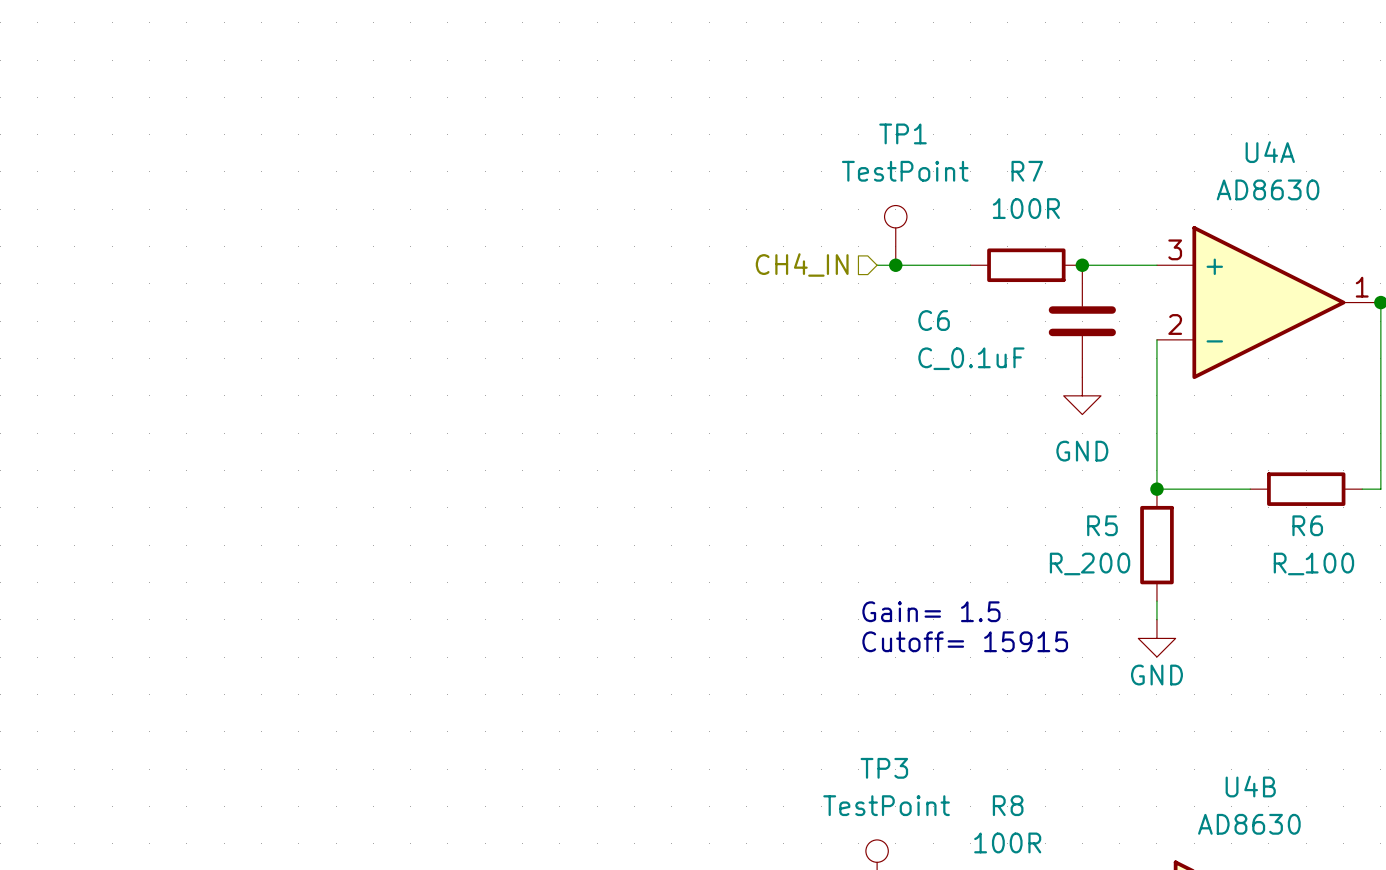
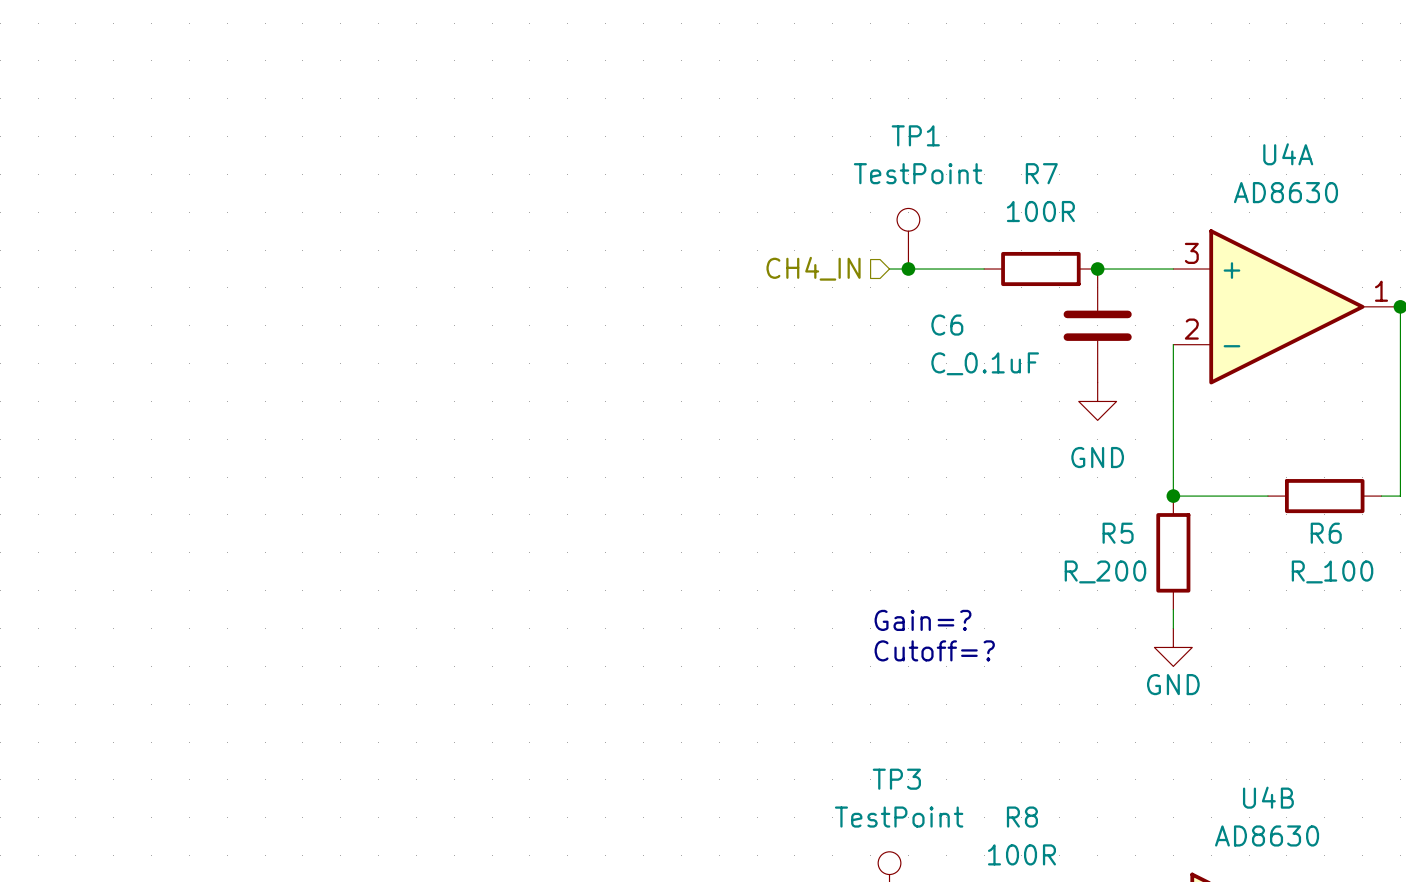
text: Gain= 1.5 (931, 611) -> Gain=? (922, 620)
text: Cutoff= 15915 (965, 641) -> Cutoff=? (934, 650)

